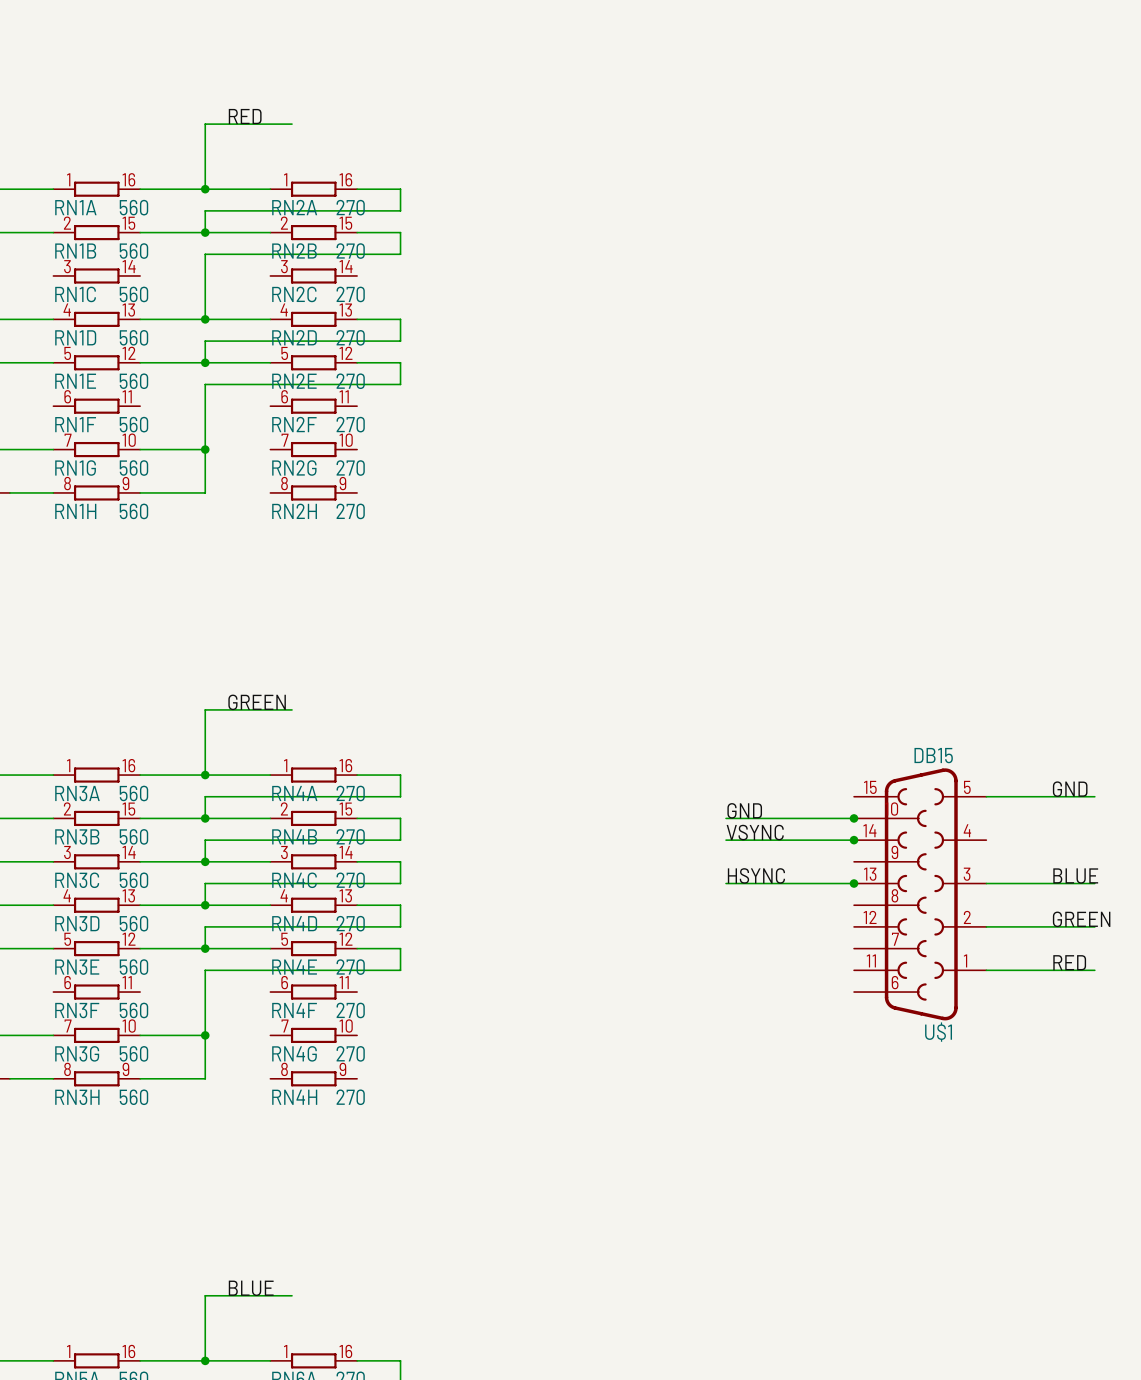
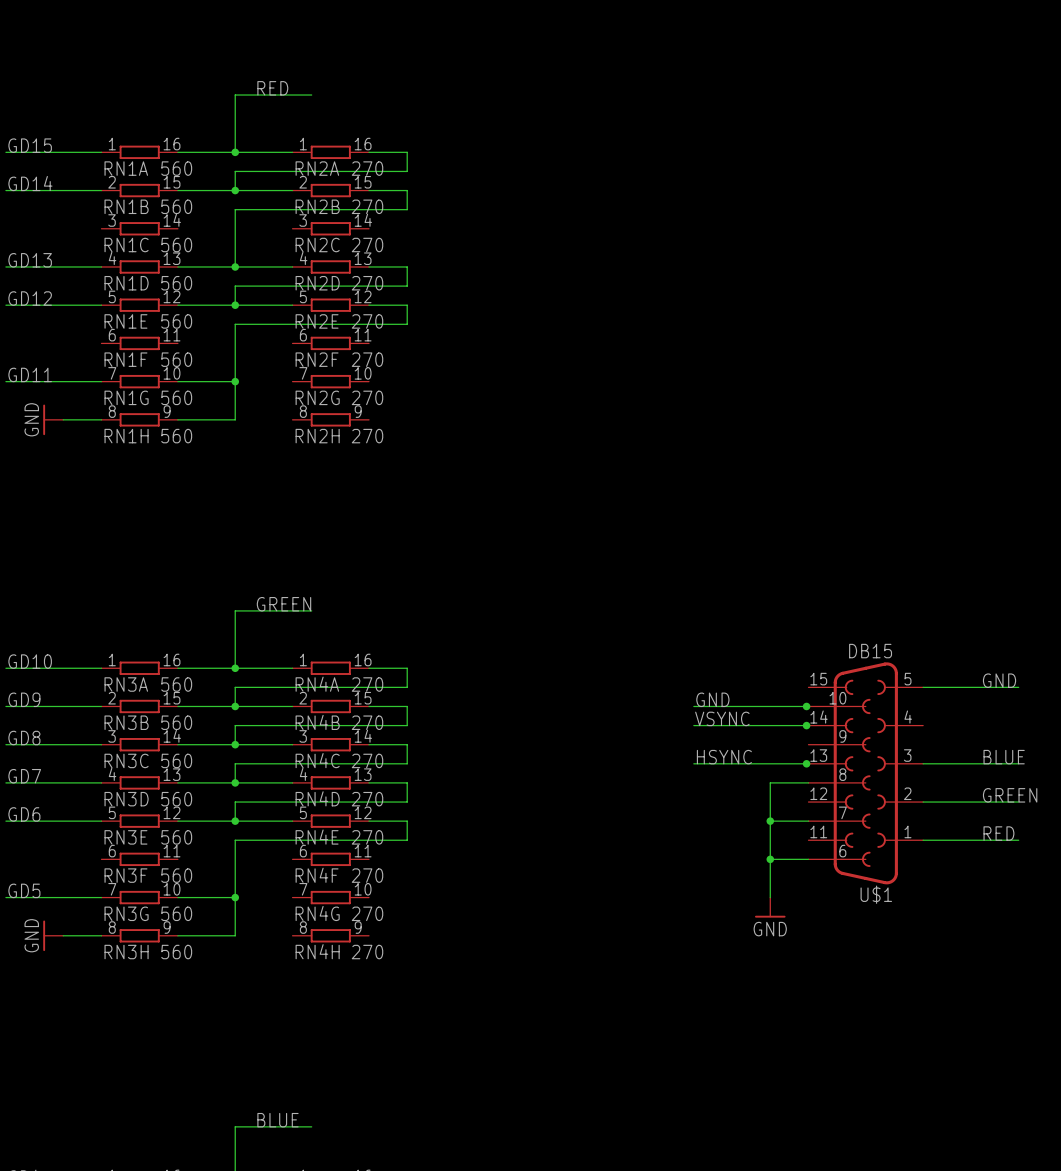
U$1 symbol: [854, 768, 987, 1021] -> [808, 662, 924, 885]
wire: none -> (808, 782) (770, 782) (770, 897)
wire: none -> (770, 821) (808, 821)
junction: none -> (770, 821)
wire: none -> (770, 859) (808, 859)
junction: none -> (770, 859)
power symbol: none -> GND (770, 907)

